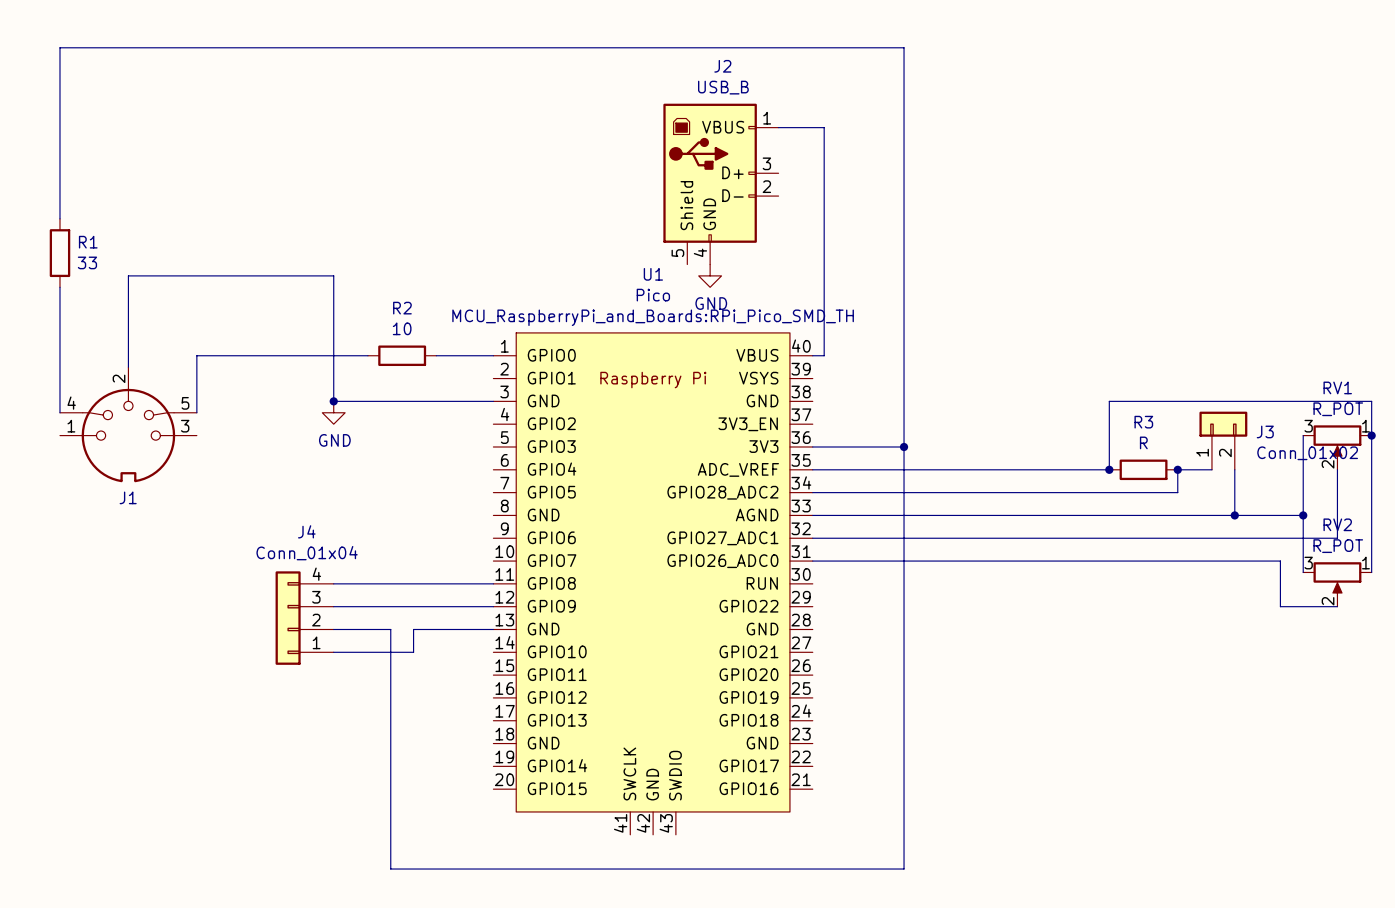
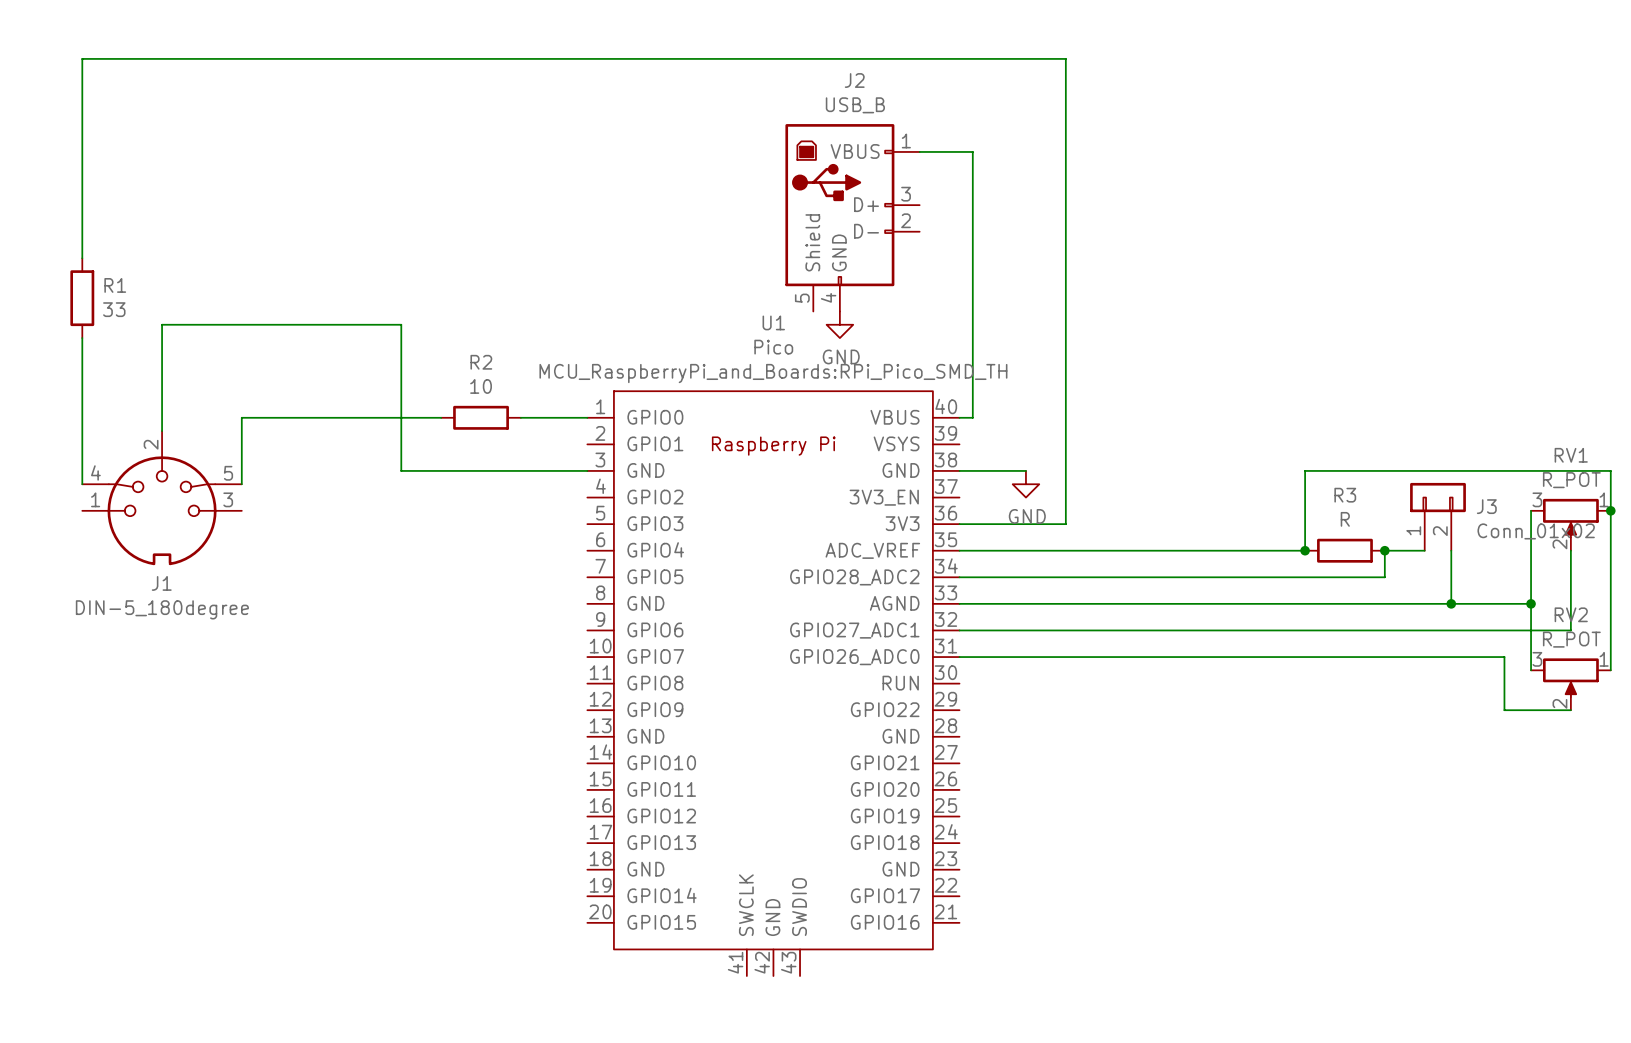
junction: (333, 401) -> none
wire: none -> (959, 470) (1025, 470)
power symbol: GND (333, 412) -> none
power symbol: none -> GND (1025, 484)
wire: (904, 446) (904, 869) (390, 869) (390, 629) (333, 629) -> none
junction: (904, 446) -> none
J1 value: none -> DIN-5_180degree (162, 609)
wire: (333, 583) (493, 583) -> none
wire: (333, 606) (493, 606) -> none
J4: Conn_01x04 (304, 618) -> none
wire: (493, 629) (413, 629) (413, 652) (333, 652) -> none

